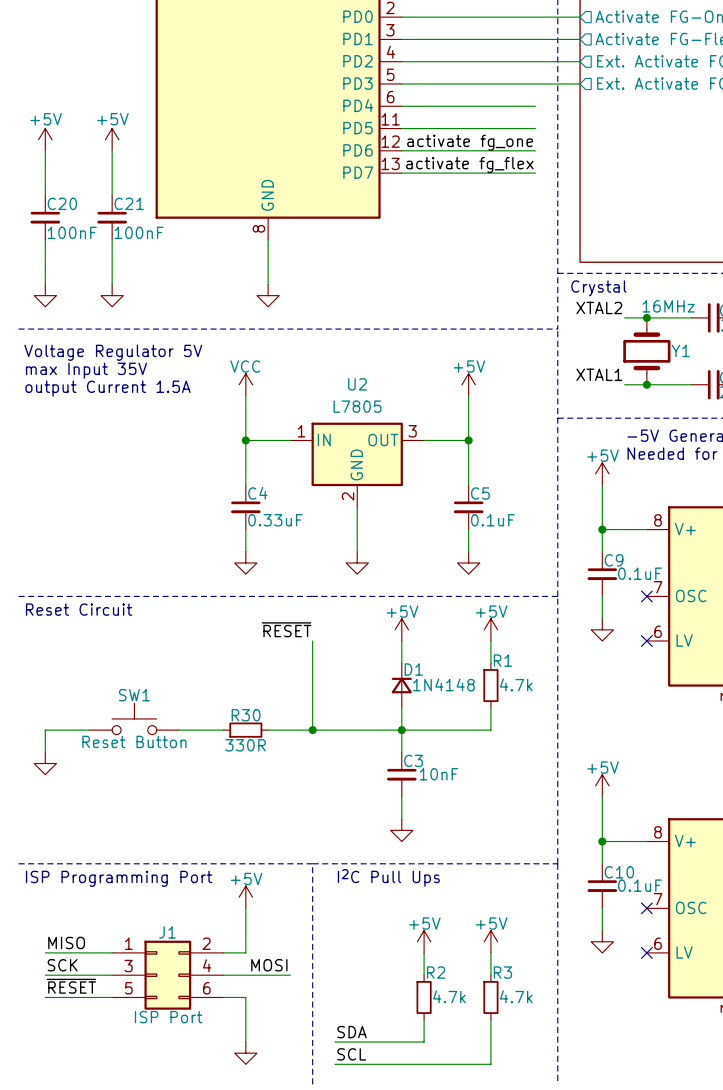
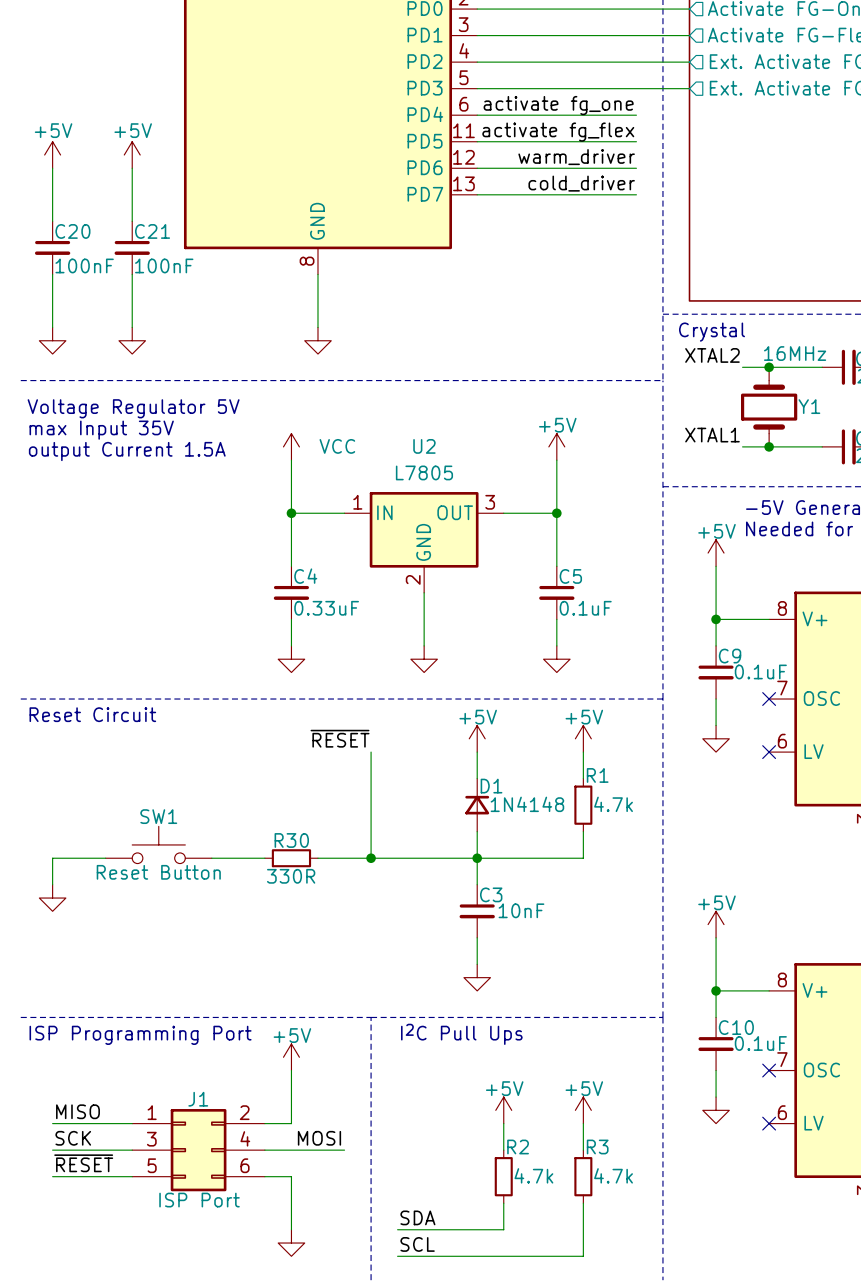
label: none -> activate fg_one (558, 105)
label: none -> activate fg_flex (558, 132)
label: activate fg_one (470, 142) -> warm_driver (576, 157)
label: activate fg_flex (469, 165) -> cold_driver (581, 183)
power symbol text position: VCC (245, 366) -> VCC (337, 446)

